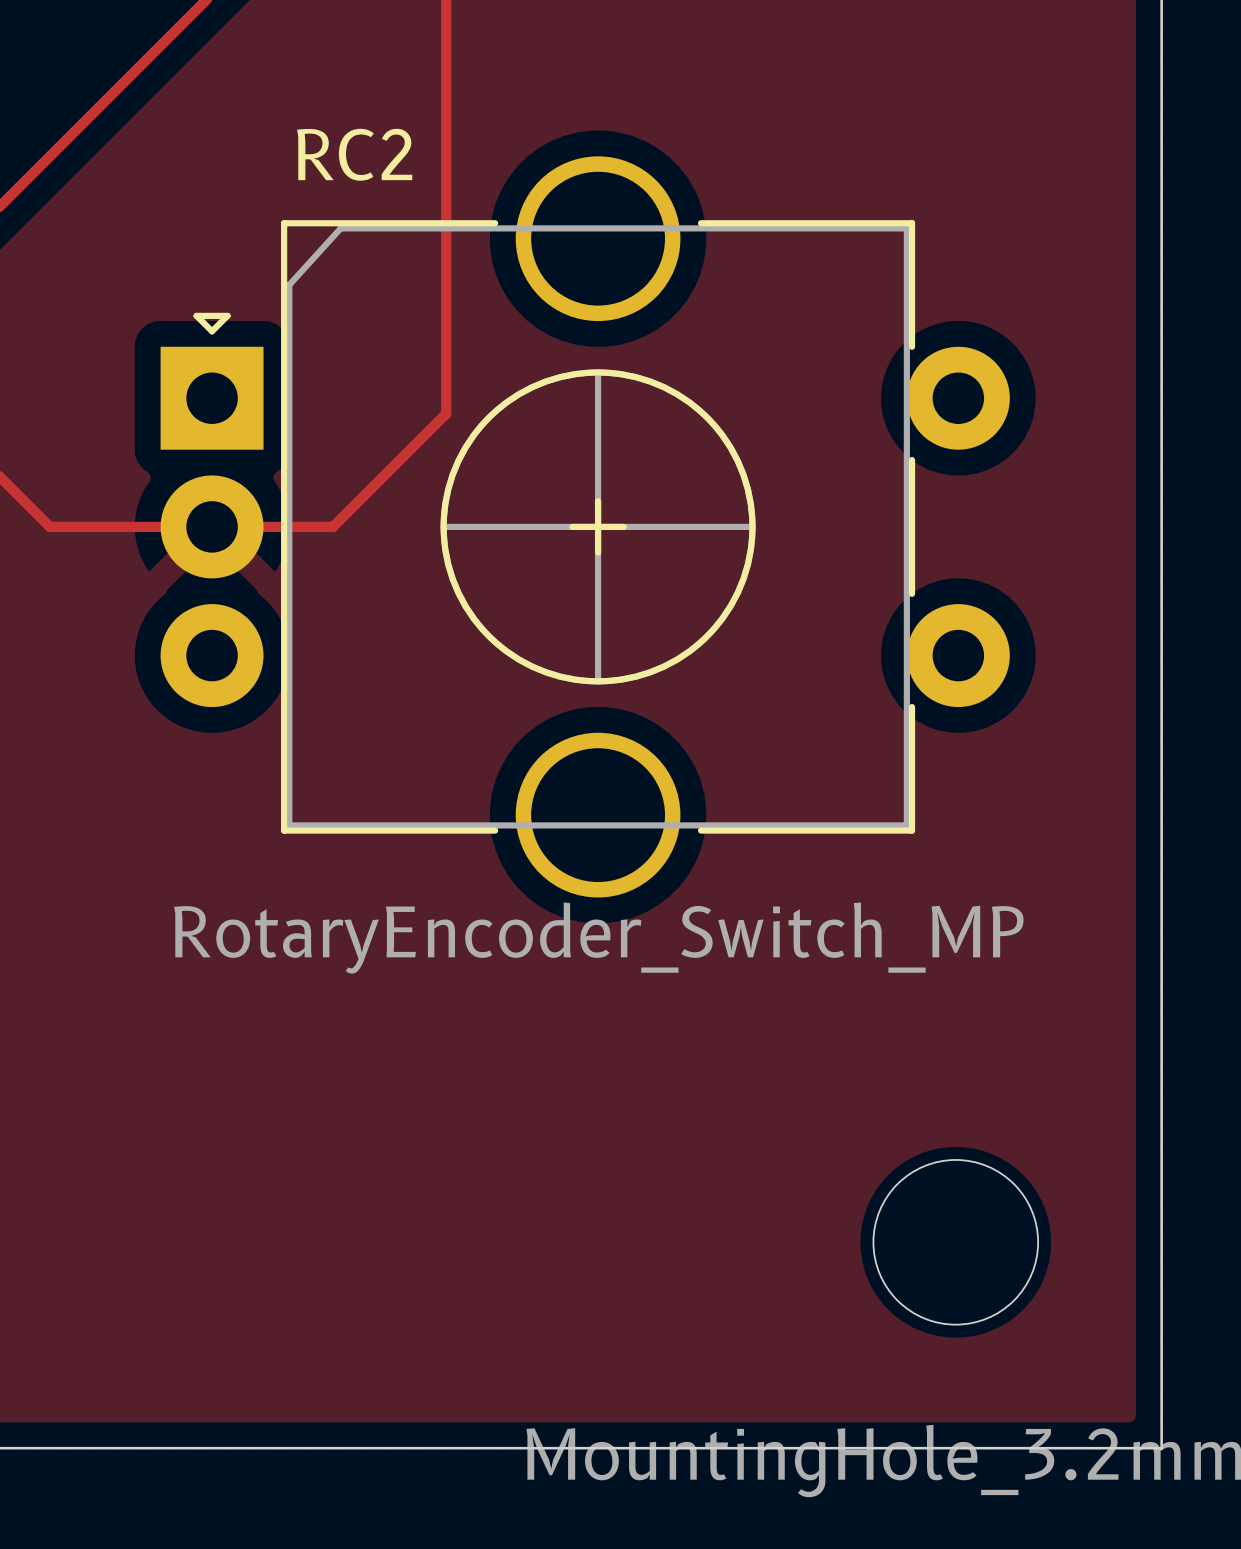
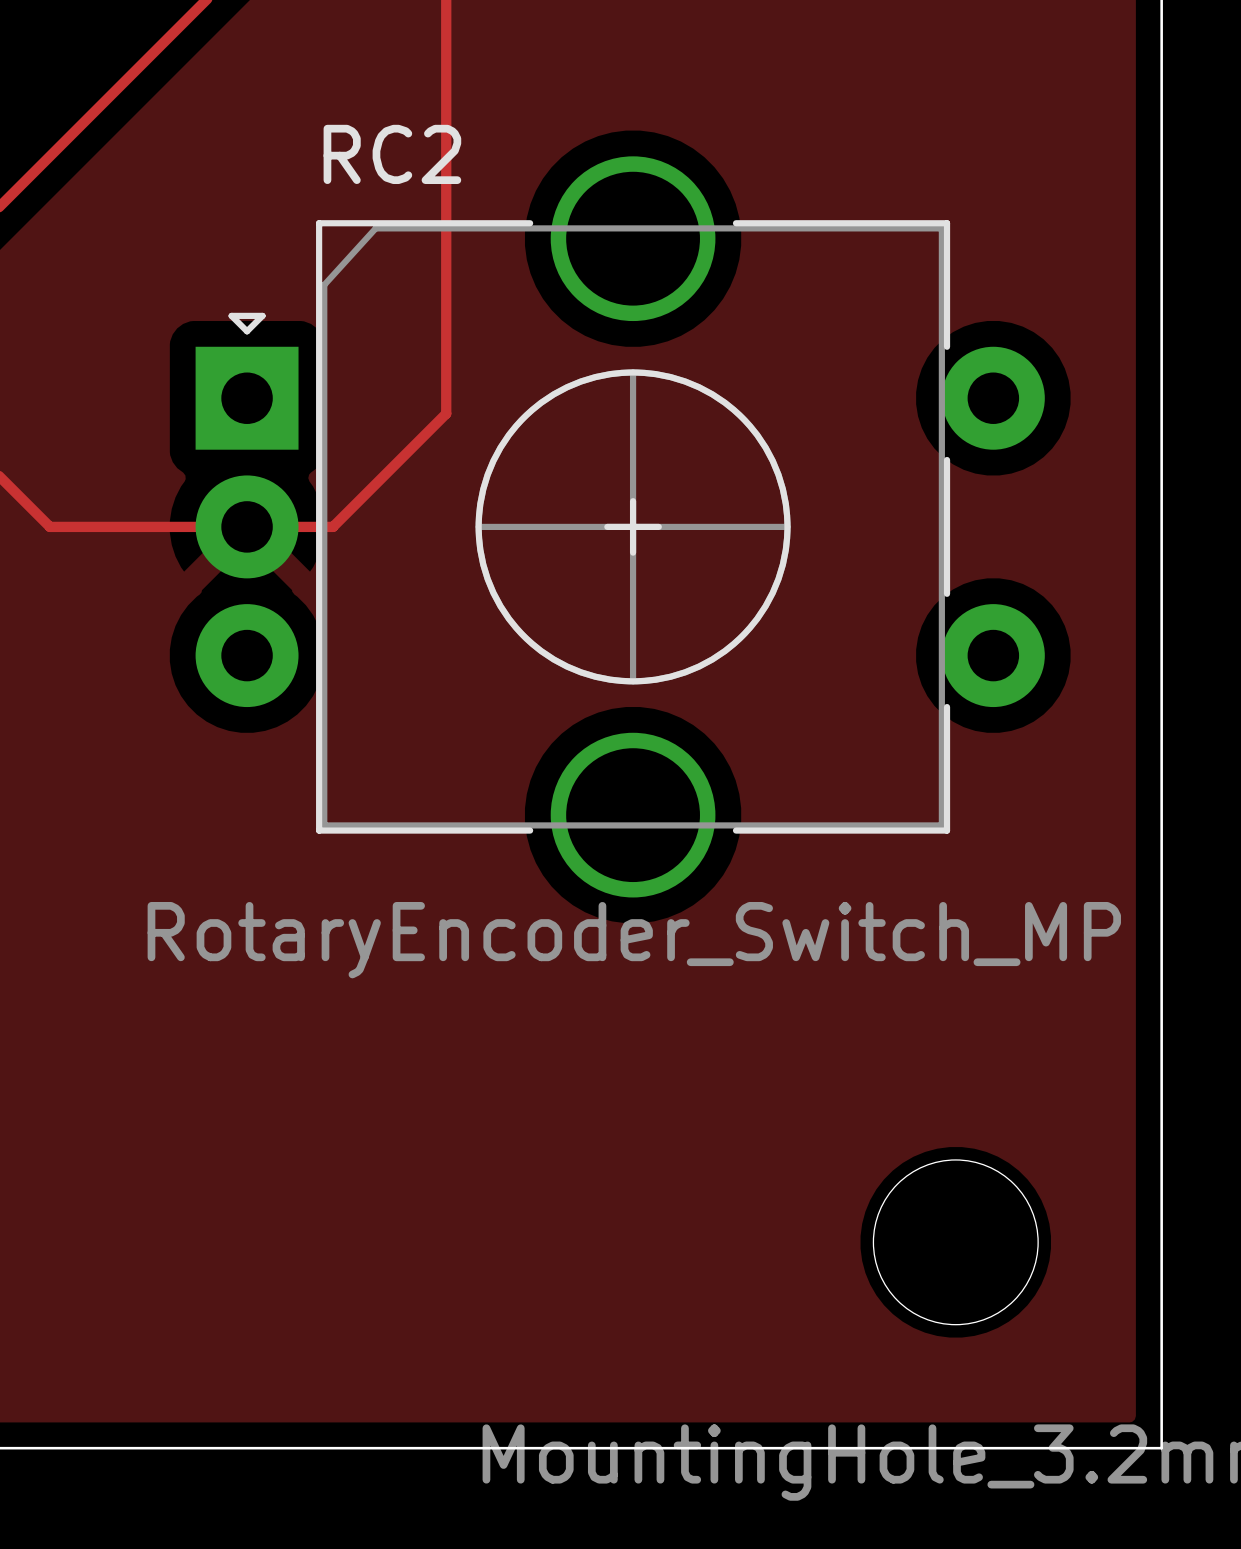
RC2 position: (585, 526) -> (620, 526)

